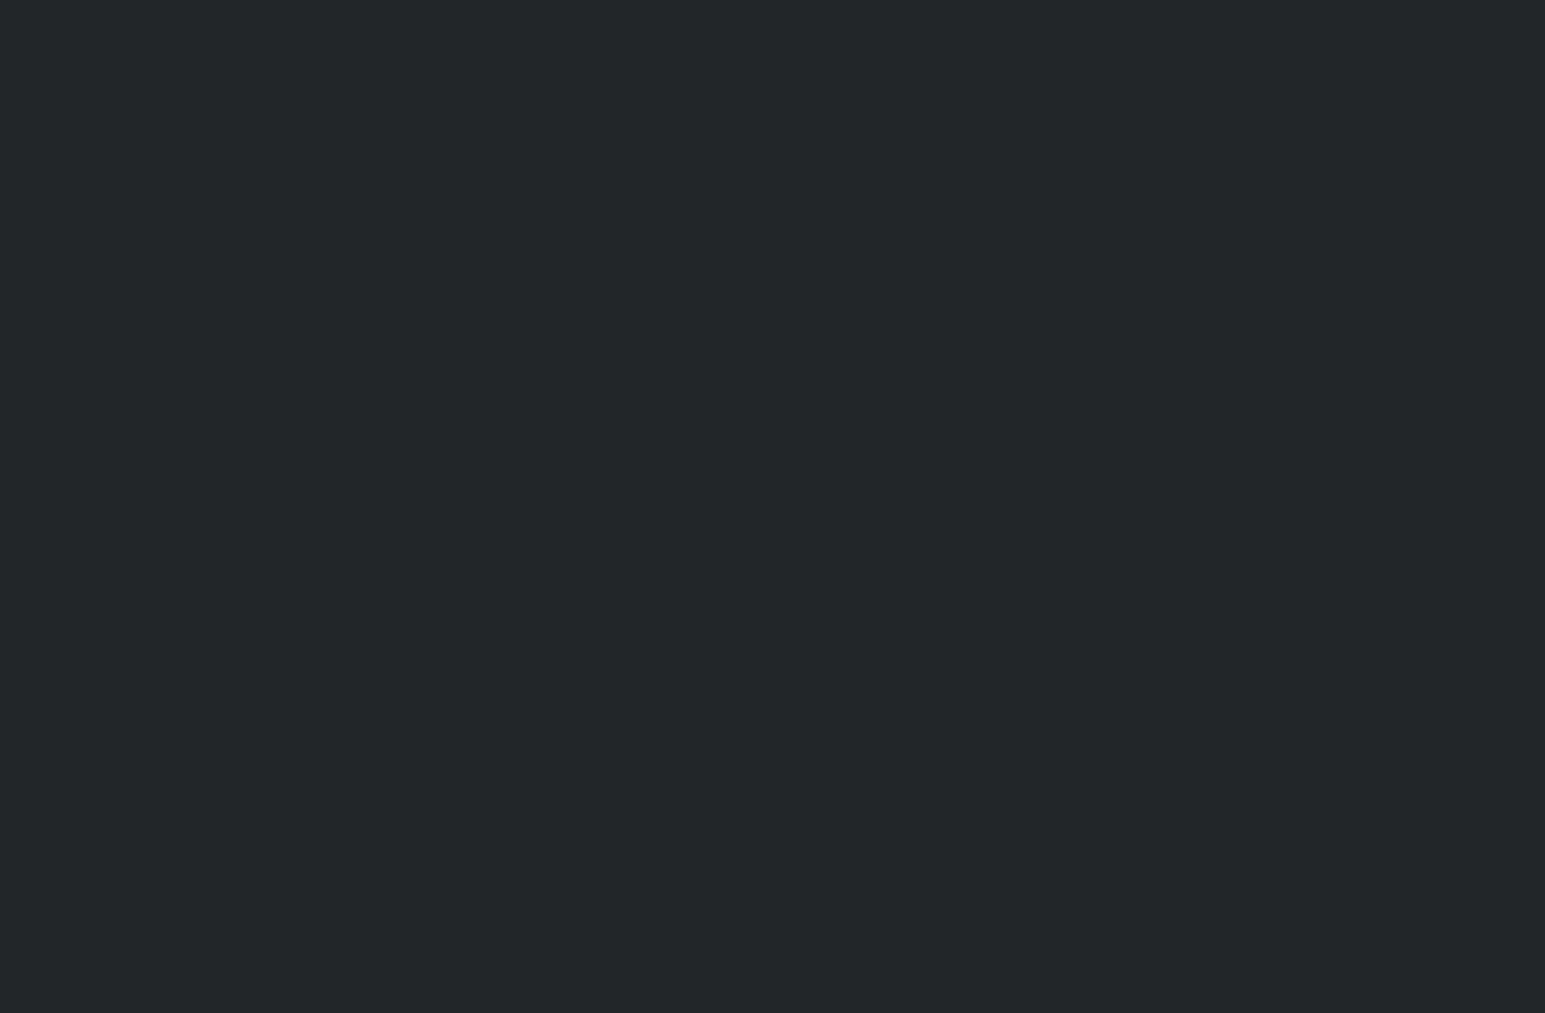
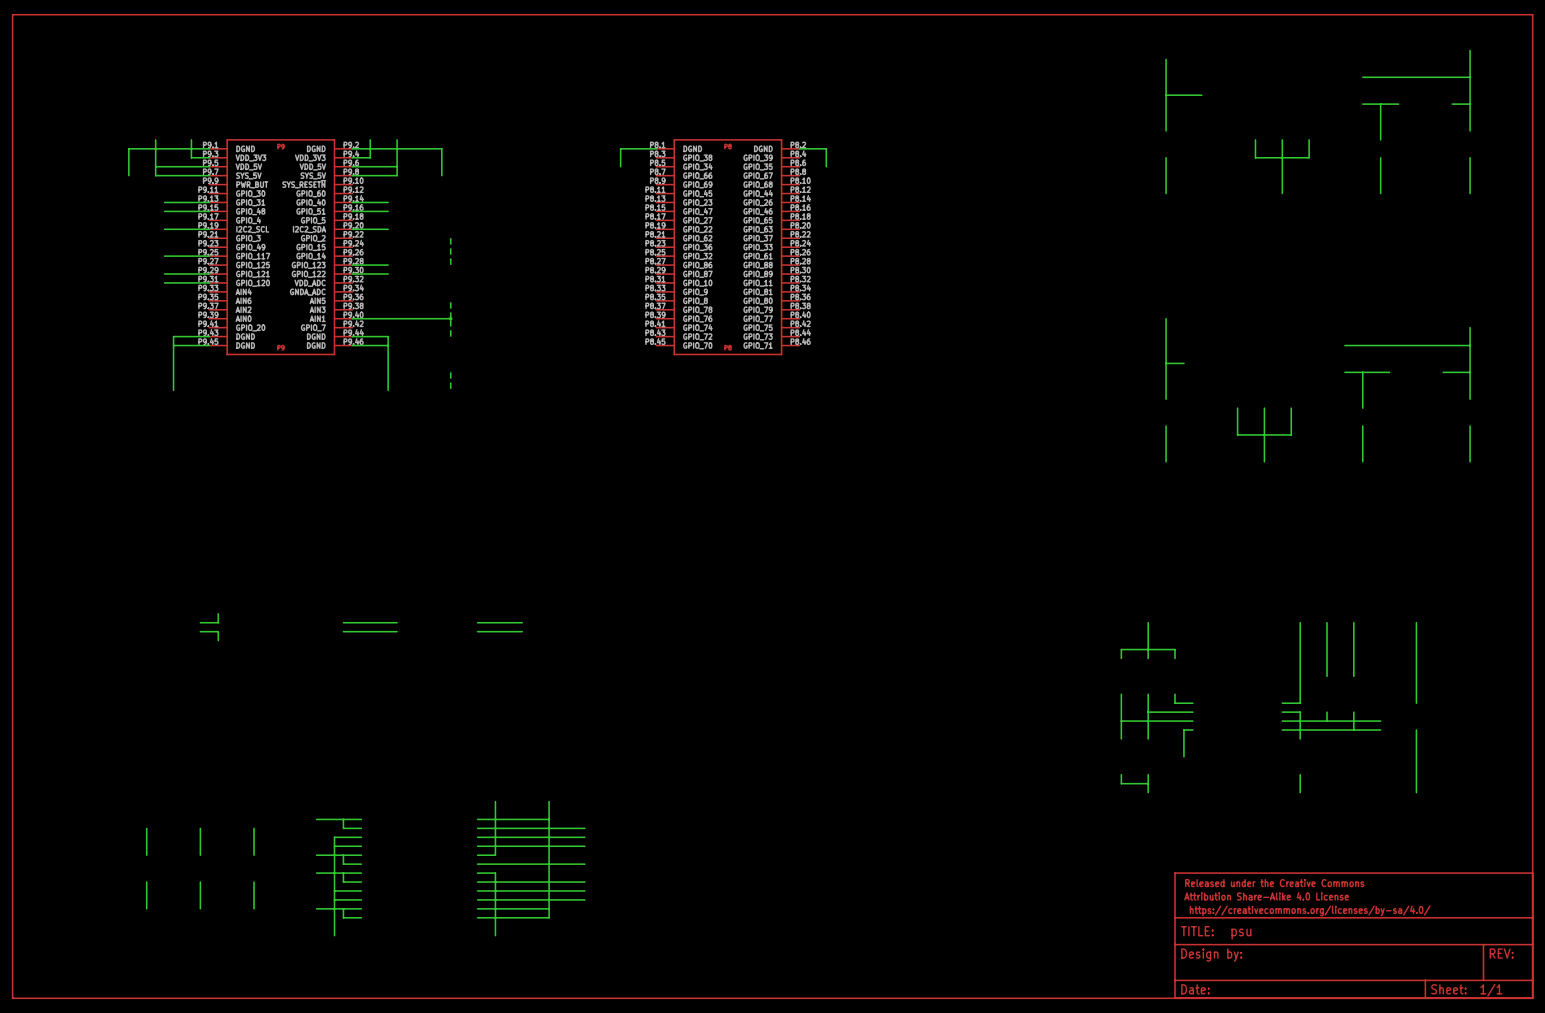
wire: none -> (1470, 50) (1470, 130)
wire: none -> (1166, 59) (1166, 130)
wire: none -> (1362, 77) (1470, 77)
wire: none -> (1166, 95) (1201, 95)
wire: none -> (1362, 104) (1398, 104)
wire: none -> (1380, 104) (1380, 139)
wire: none -> (1452, 104) (1470, 104)
wire: none -> (155, 139) (155, 175) (209, 175)
wire: none -> (191, 139) (191, 157) (209, 157)
wire: none -> (370, 139) (370, 157) (352, 157)
wire: none -> (397, 139) (397, 175) (352, 175)
wire: none -> (1255, 139) (1255, 157) (1309, 157) (1309, 139)
wire: none -> (1282, 139) (1282, 193)
wire: none -> (209, 148) (128, 148) (128, 175)
wire: none -> (352, 148) (441, 148) (441, 175)
wire: none -> (656, 148) (620, 148) (620, 166)
wire: none -> (799, 148) (826, 148) (826, 166)
wire: none -> (1166, 157) (1166, 193)
wire: none -> (1380, 157) (1380, 193)
wire: none -> (1470, 157) (1470, 193)
wire: none -> (155, 166) (209, 166)
wire: none -> (352, 166) (397, 166)
wire: none -> (164, 202) (209, 202)
wire: none -> (352, 202) (388, 202)
wire: none -> (164, 211) (209, 211)
wire: none -> (352, 211) (388, 211)
wire: none -> (164, 229) (209, 229)
wire: none -> (352, 229) (388, 229)
wire: none -> (450, 238) (450, 265)
part: none -> (280, 247)
part: none -> (727, 247)
wire: none -> (164, 256) (209, 256)
wire: none -> (352, 265) (388, 265)
wire: none -> (164, 274) (209, 274)
wire: none -> (352, 274) (388, 274)
wire: none -> (164, 282) (209, 282)
wire: none -> (450, 300) (450, 336)
wire: none -> (352, 318) (450, 318)
junction: none -> (450, 318)
wire: none -> (1166, 318) (1166, 399)
wire: none -> (1470, 327) (1470, 399)
wire: none -> (209, 336) (173, 336) (173, 390)
wire: none -> (352, 336) (388, 336) (388, 390)
wire: none -> (173, 345) (209, 345)
wire: none -> (352, 345) (388, 345)
wire: none -> (1344, 345) (1470, 345)
wire: none -> (1166, 363) (1183, 363)
wire: none -> (450, 372) (450, 390)
wire: none -> (1344, 372) (1389, 372)
wire: none -> (1362, 372) (1362, 408)
wire: none -> (1443, 372) (1470, 372)
wire: none -> (1237, 408) (1237, 434) (1291, 434) (1291, 408)
wire: none -> (1264, 408) (1264, 461)
wire: none -> (1166, 426) (1166, 461)
wire: none -> (1362, 426) (1362, 461)
wire: none -> (1470, 426) (1470, 461)
part: none -> (772, 506)
wire: none -> (218, 613) (218, 622) (200, 622)
wire: none -> (343, 622) (397, 622)
wire: none -> (477, 622) (522, 622)
wire: none -> (1148, 622) (1148, 658)
wire: none -> (1300, 622) (1300, 703) (1282, 703)
wire: none -> (1327, 622) (1327, 676)
wire: none -> (1353, 622) (1353, 676)
wire: none -> (1416, 622) (1416, 703)
wire: none -> (200, 631) (218, 631) (218, 640)
wire: none -> (343, 631) (397, 631)
wire: none -> (477, 631) (522, 631)
wire: none -> (1121, 658) (1121, 649) (1175, 649) (1175, 658)
wire: none -> (1121, 694) (1121, 738)
wire: none -> (1148, 694) (1148, 738)
wire: none -> (1175, 694) (1175, 703) (1192, 703)
wire: none -> (1148, 712) (1192, 712)
wire: none -> (1282, 712) (1300, 712) (1300, 738)
wire: none -> (1327, 712) (1327, 721)
wire: none -> (1353, 712) (1353, 730)
wire: none -> (1121, 721) (1192, 721)
wire: none -> (1282, 721) (1380, 721)
wire: none -> (1192, 730) (1183, 730) (1183, 756)
wire: none -> (1282, 730) (1380, 730)
wire: none -> (1416, 730) (1416, 792)
wire: none -> (1121, 774) (1121, 783) (1148, 783)
wire: none -> (1148, 774) (1148, 792)
wire: none -> (1300, 774) (1300, 792)
wire: none -> (495, 801) (495, 855) (477, 855)
wire: none -> (549, 801) (549, 917) (477, 917)
wire: none -> (316, 819) (361, 819)
wire: none -> (343, 819) (343, 828) (361, 828)
wire: none -> (477, 819) (549, 819)
wire: none -> (146, 828) (146, 855)
wire: none -> (200, 828) (200, 855)
wire: none -> (254, 828) (254, 855)
wire: none -> (477, 828) (584, 828)
wire: none -> (361, 837) (334, 837) (334, 935)
wire: none -> (477, 837) (584, 837)
wire: none -> (334, 846) (361, 846)
wire: none -> (477, 846) (584, 846)
wire: none -> (316, 855) (361, 855)
wire: none -> (343, 855) (343, 864) (361, 864)
wire: none -> (477, 864) (584, 864)
wire: none -> (316, 873) (361, 873)
wire: none -> (343, 873) (343, 882) (361, 882)
wire: none -> (477, 873) (495, 873) (495, 935)
wire: none -> (146, 882) (146, 908)
wire: none -> (200, 882) (200, 908)
wire: none -> (254, 882) (254, 908)
wire: none -> (477, 882) (584, 882)
wire: none -> (334, 890) (361, 890)
wire: none -> (477, 890) (584, 890)
wire: none -> (334, 899) (361, 899)
wire: none -> (477, 899) (584, 899)
wire: none -> (316, 908) (361, 908)
wire: none -> (343, 908) (343, 917) (361, 917)
wire: none -> (477, 908) (549, 908)
part: none -> (1353, 935)

